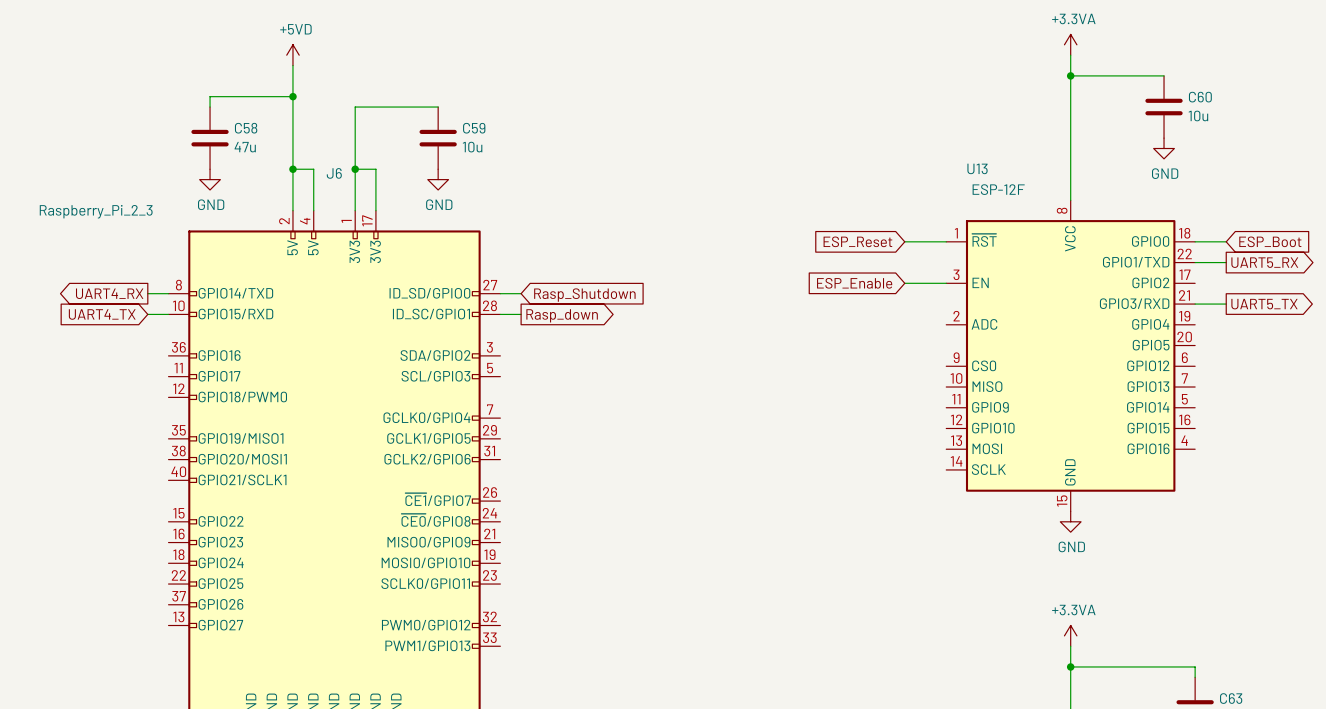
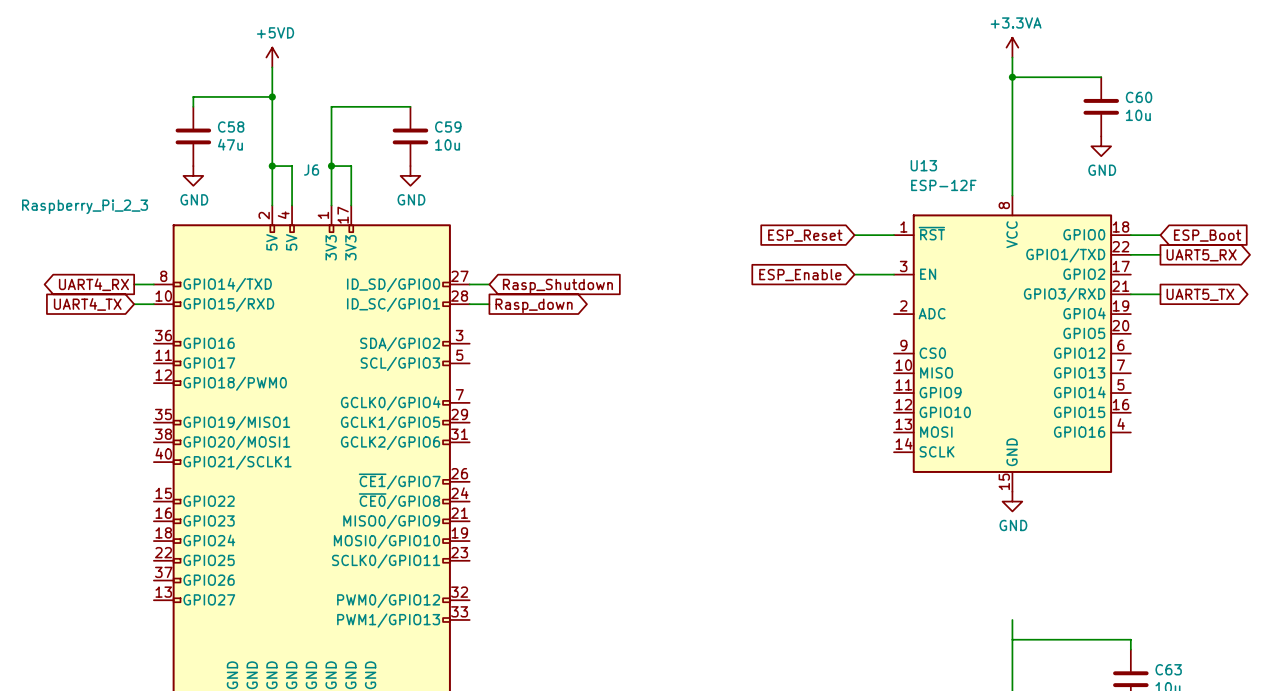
power symbol: +3.3VA (1070, 635) -> none
junction: (1070, 666) -> none

